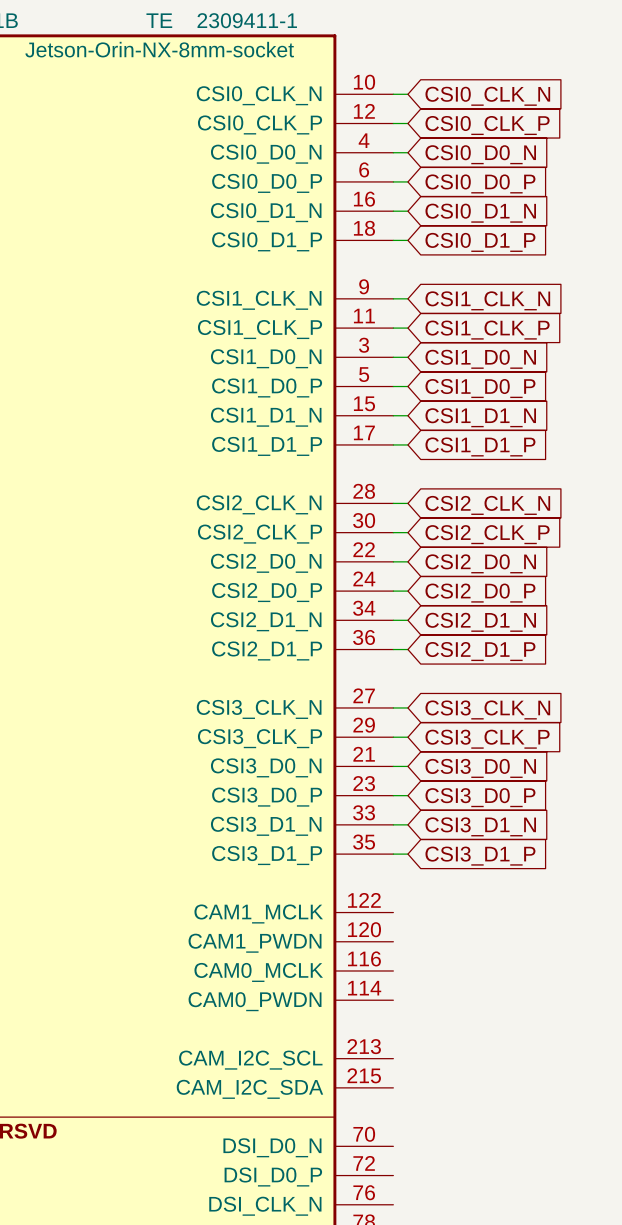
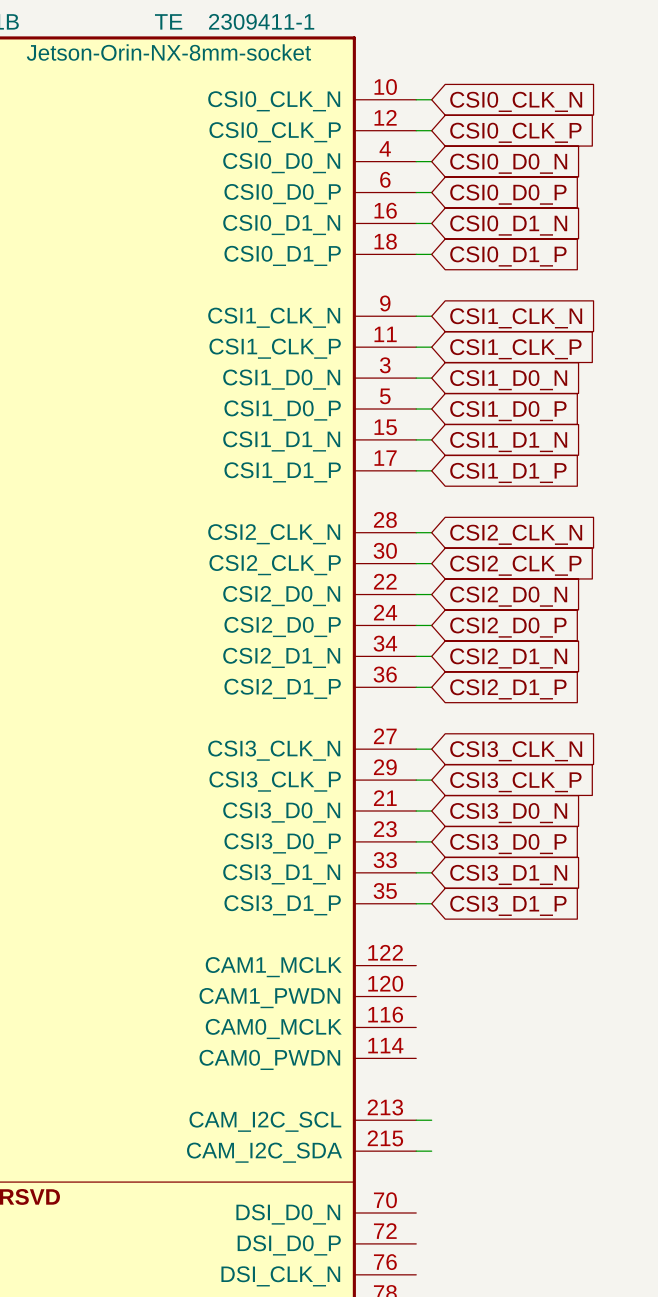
wire: none -> (416, 1120) (431, 1120)
wire: none -> (416, 1151) (431, 1151)

